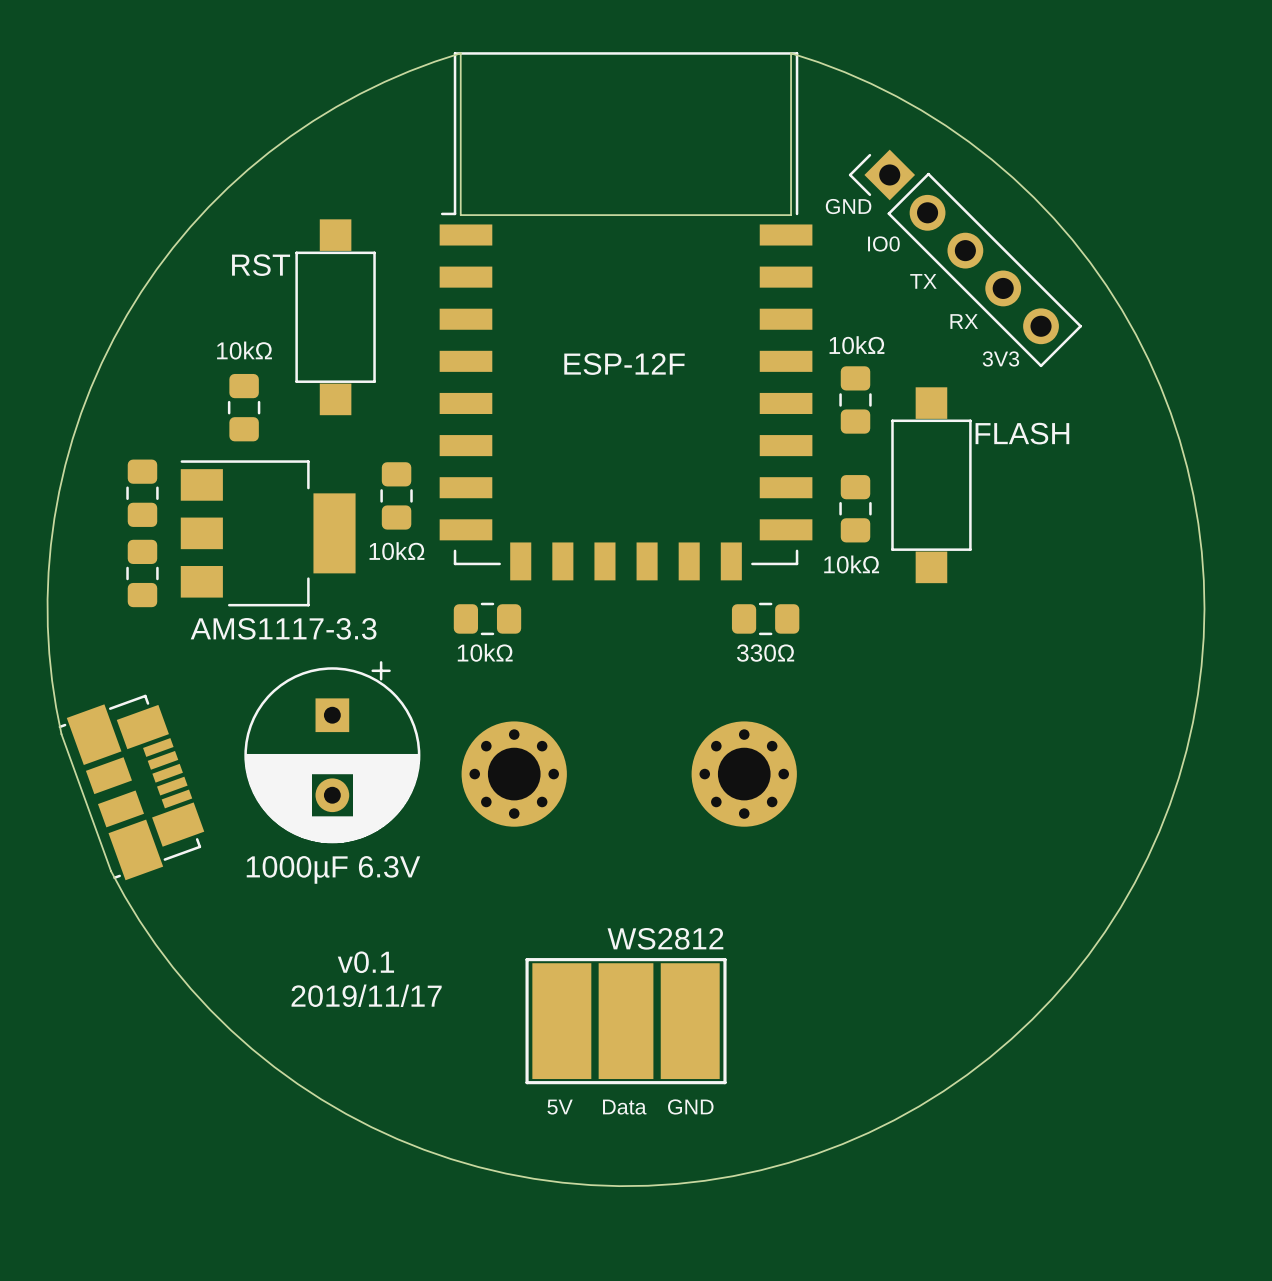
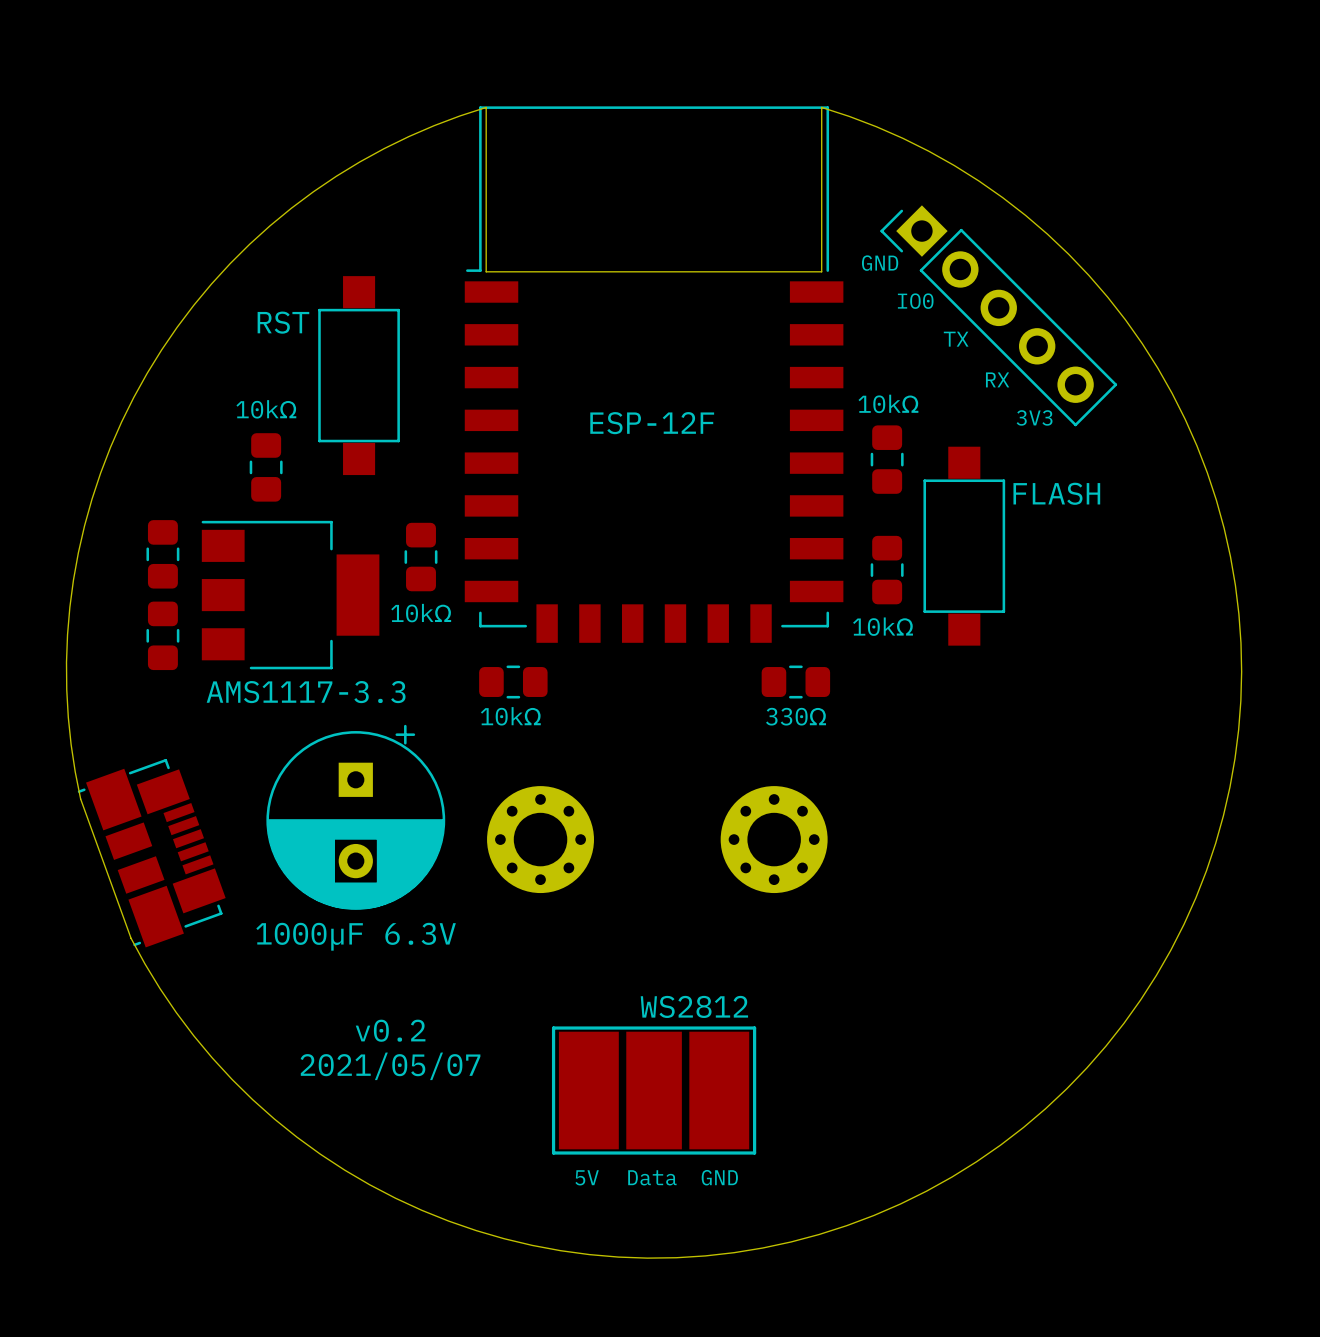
text: v0.1 (365, 962) -> v0.2 (390, 1030)
text: 2019/11/17 (366, 995) -> 2021/05/07 (390, 1066)

